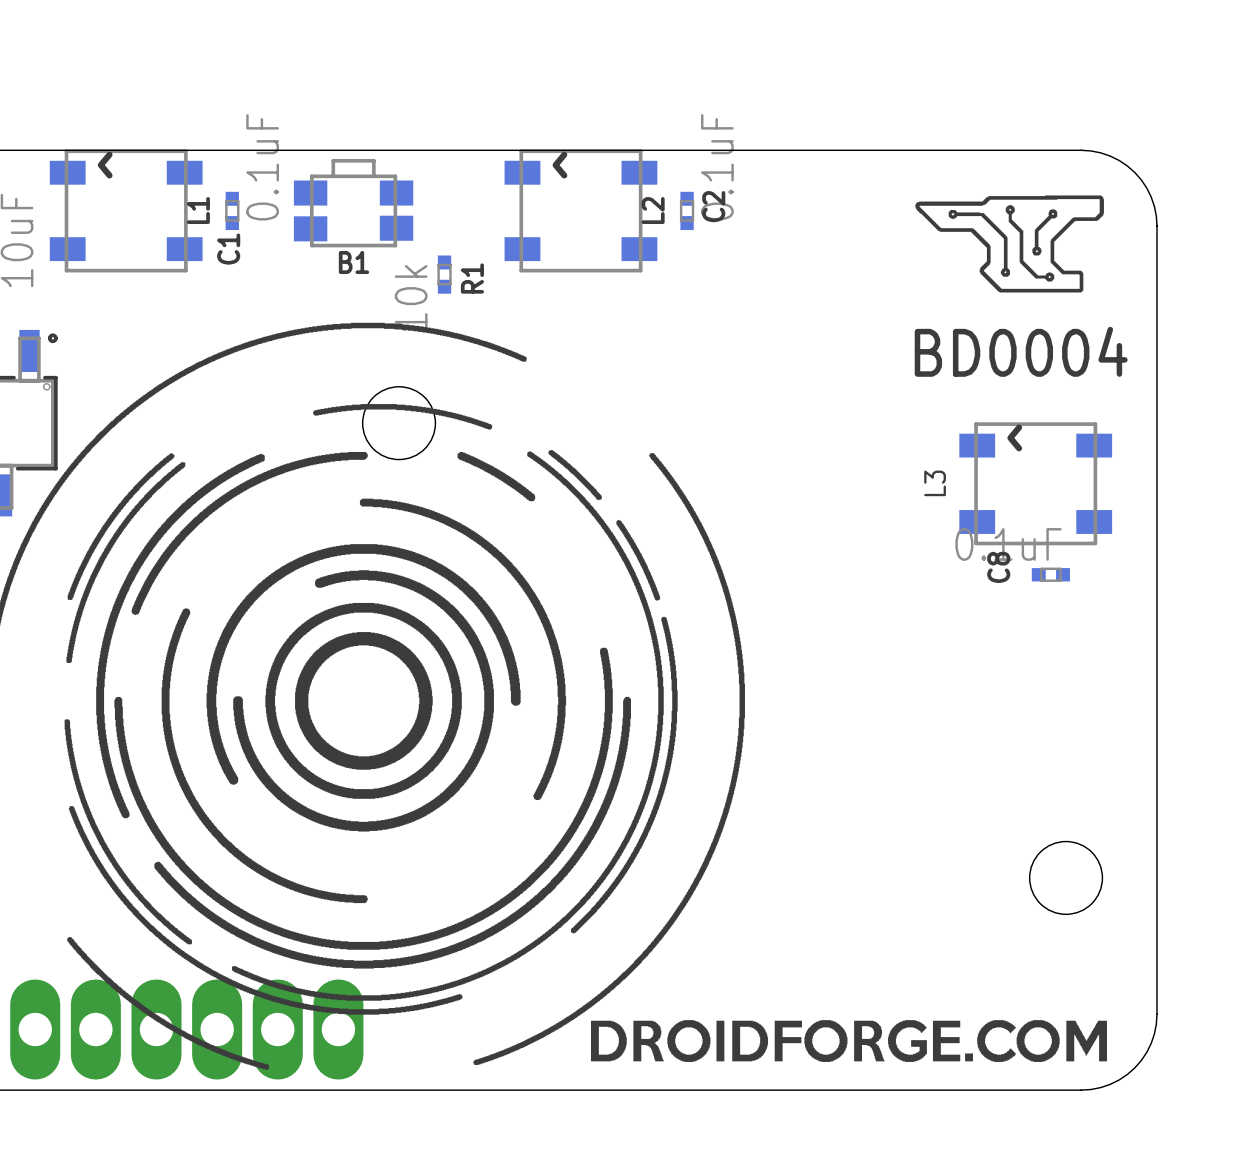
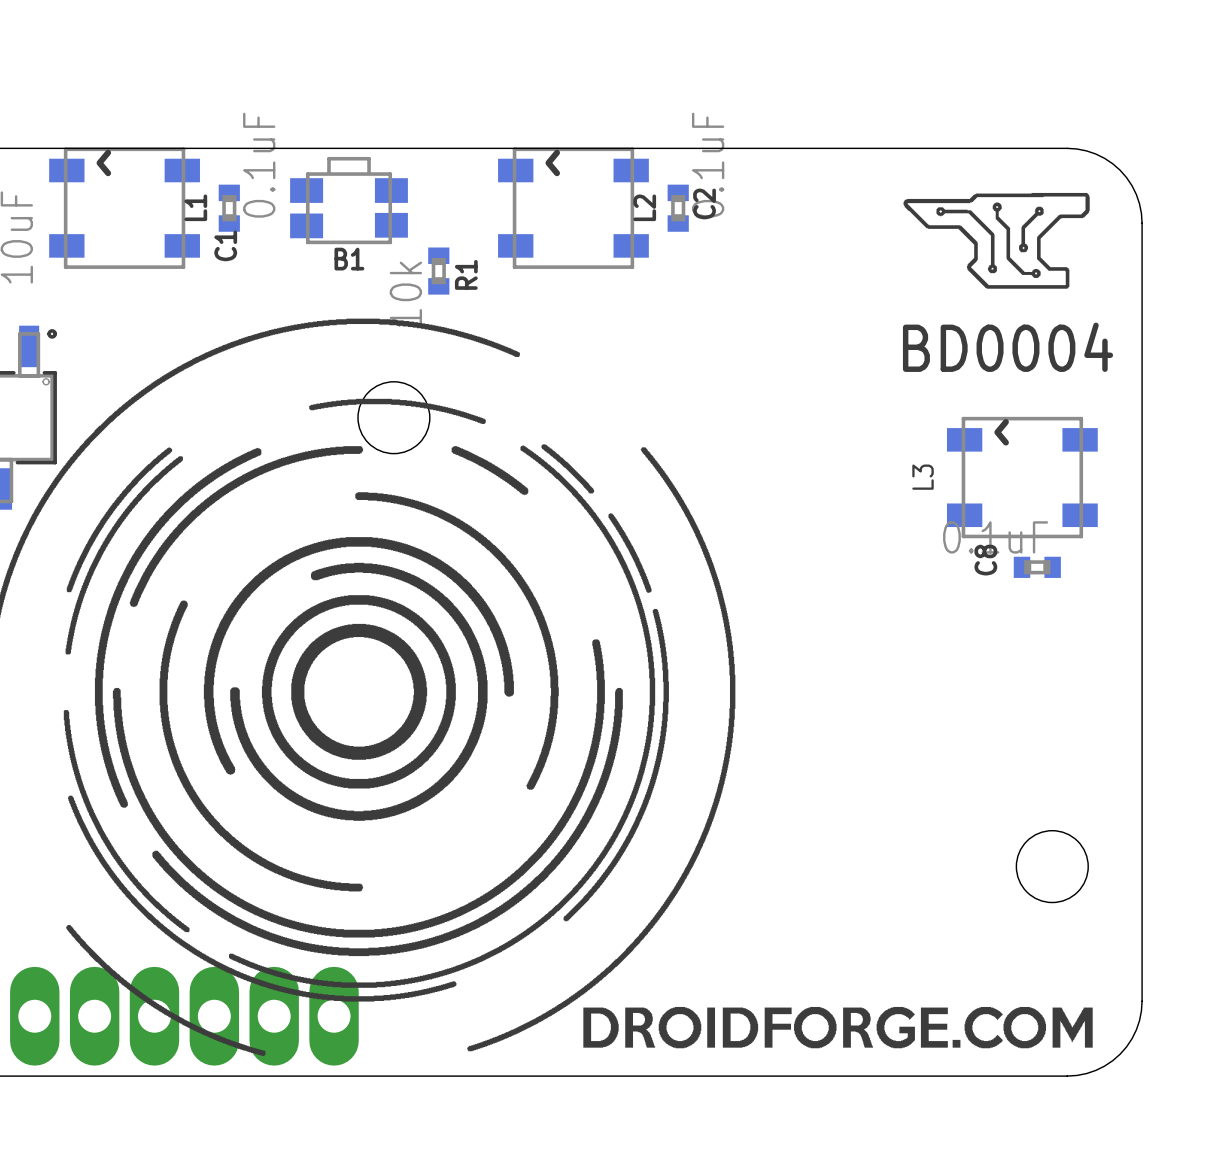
C1 footprint: [225, 191, 240, 231] -> [218, 184, 240, 232]
C2 footprint: [679, 191, 695, 231] -> [667, 184, 689, 232]
R1 footprint: [437, 255, 452, 294] -> [428, 247, 450, 295]
C8 footprint: [1031, 567, 1070, 582] -> [1013, 556, 1061, 578]

